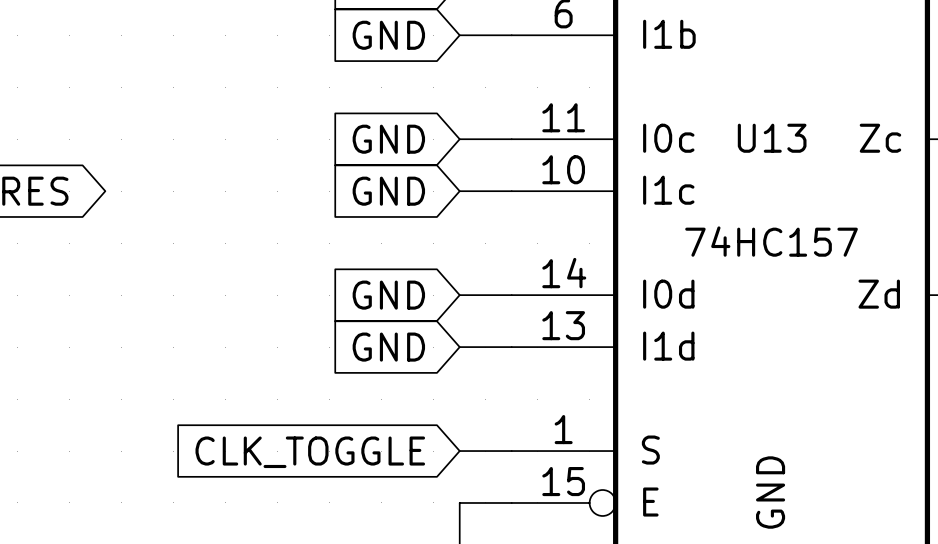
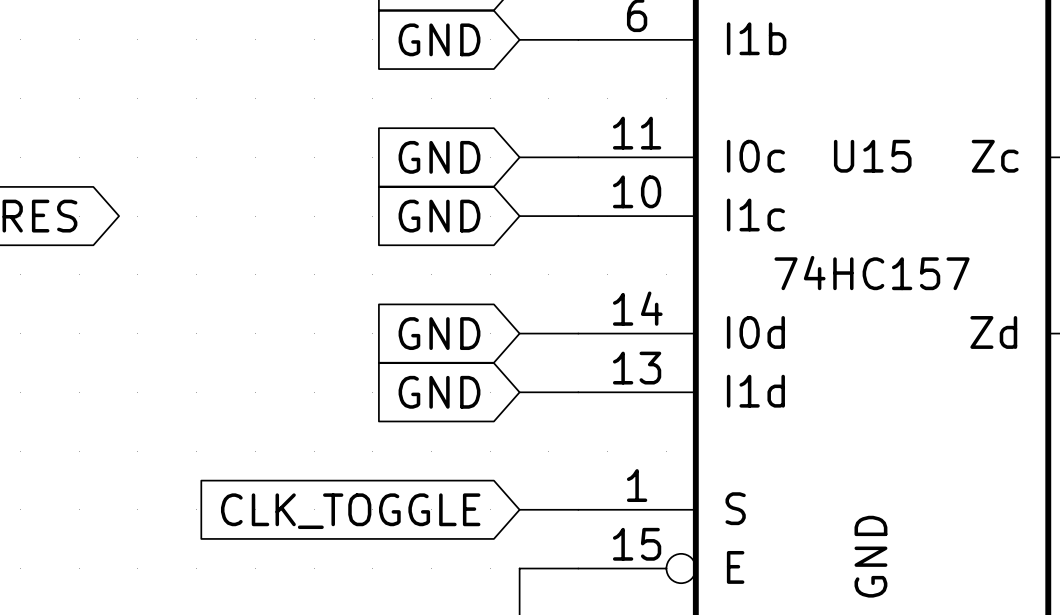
U13 name: U13 (772, 138) -> U15 (872, 156)

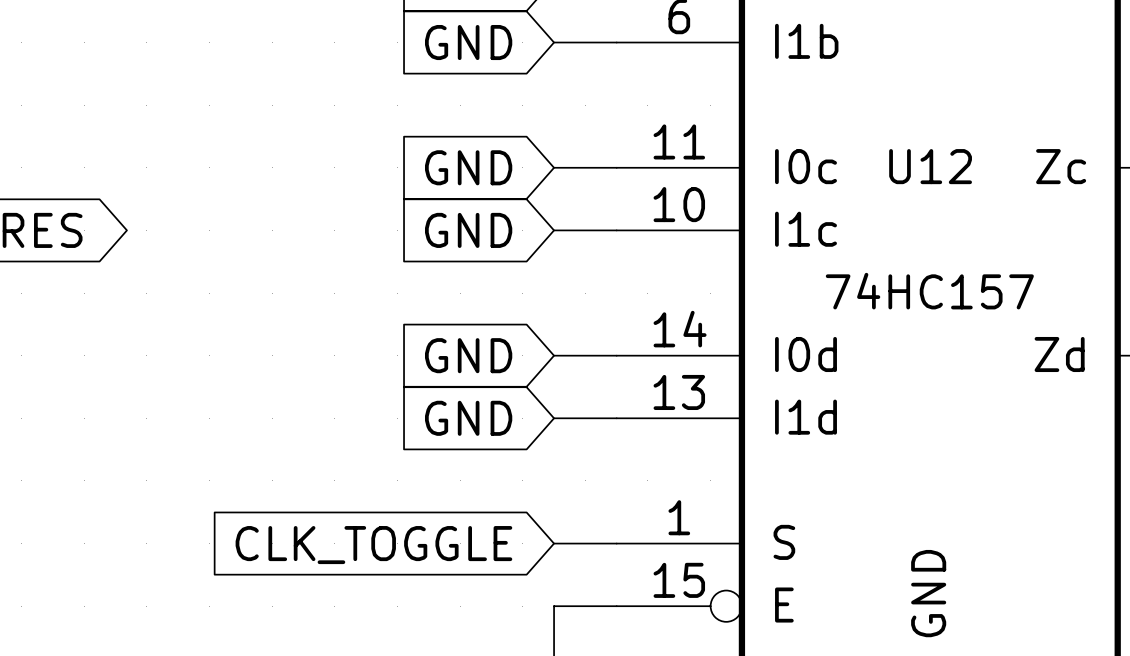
U15 name: U15 (872, 156) -> U12 (930, 166)

